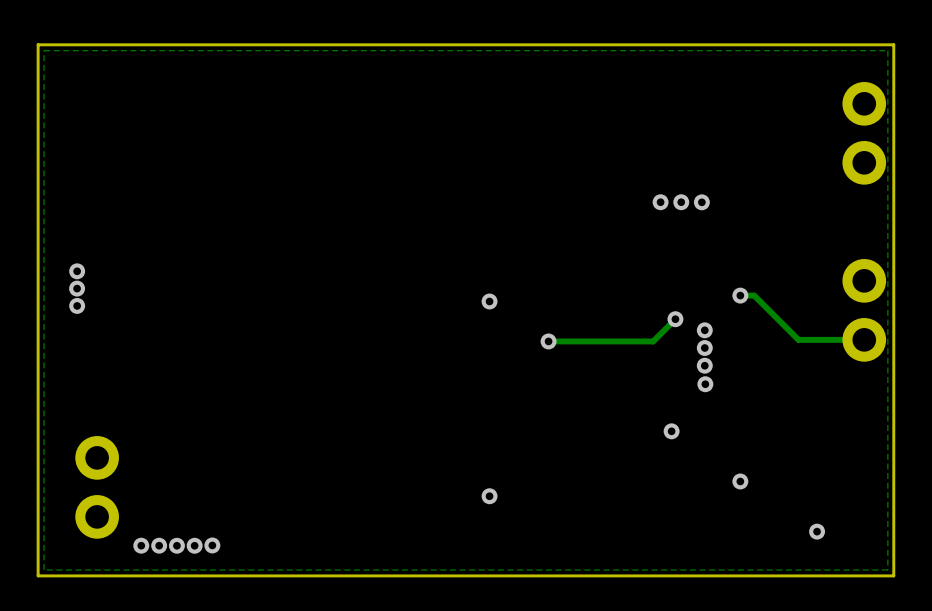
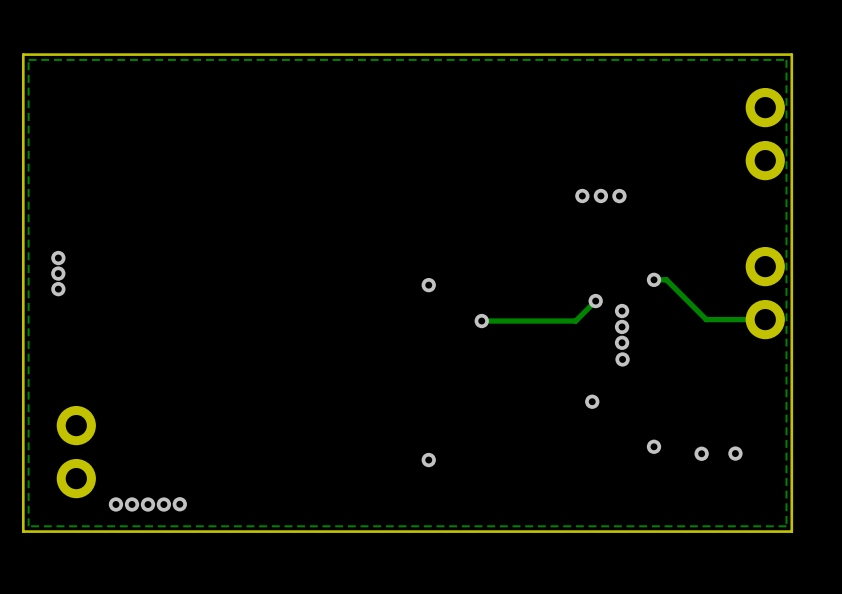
via: none -> (701, 453)
via: none -> (735, 453)
via: (817, 531) -> none

